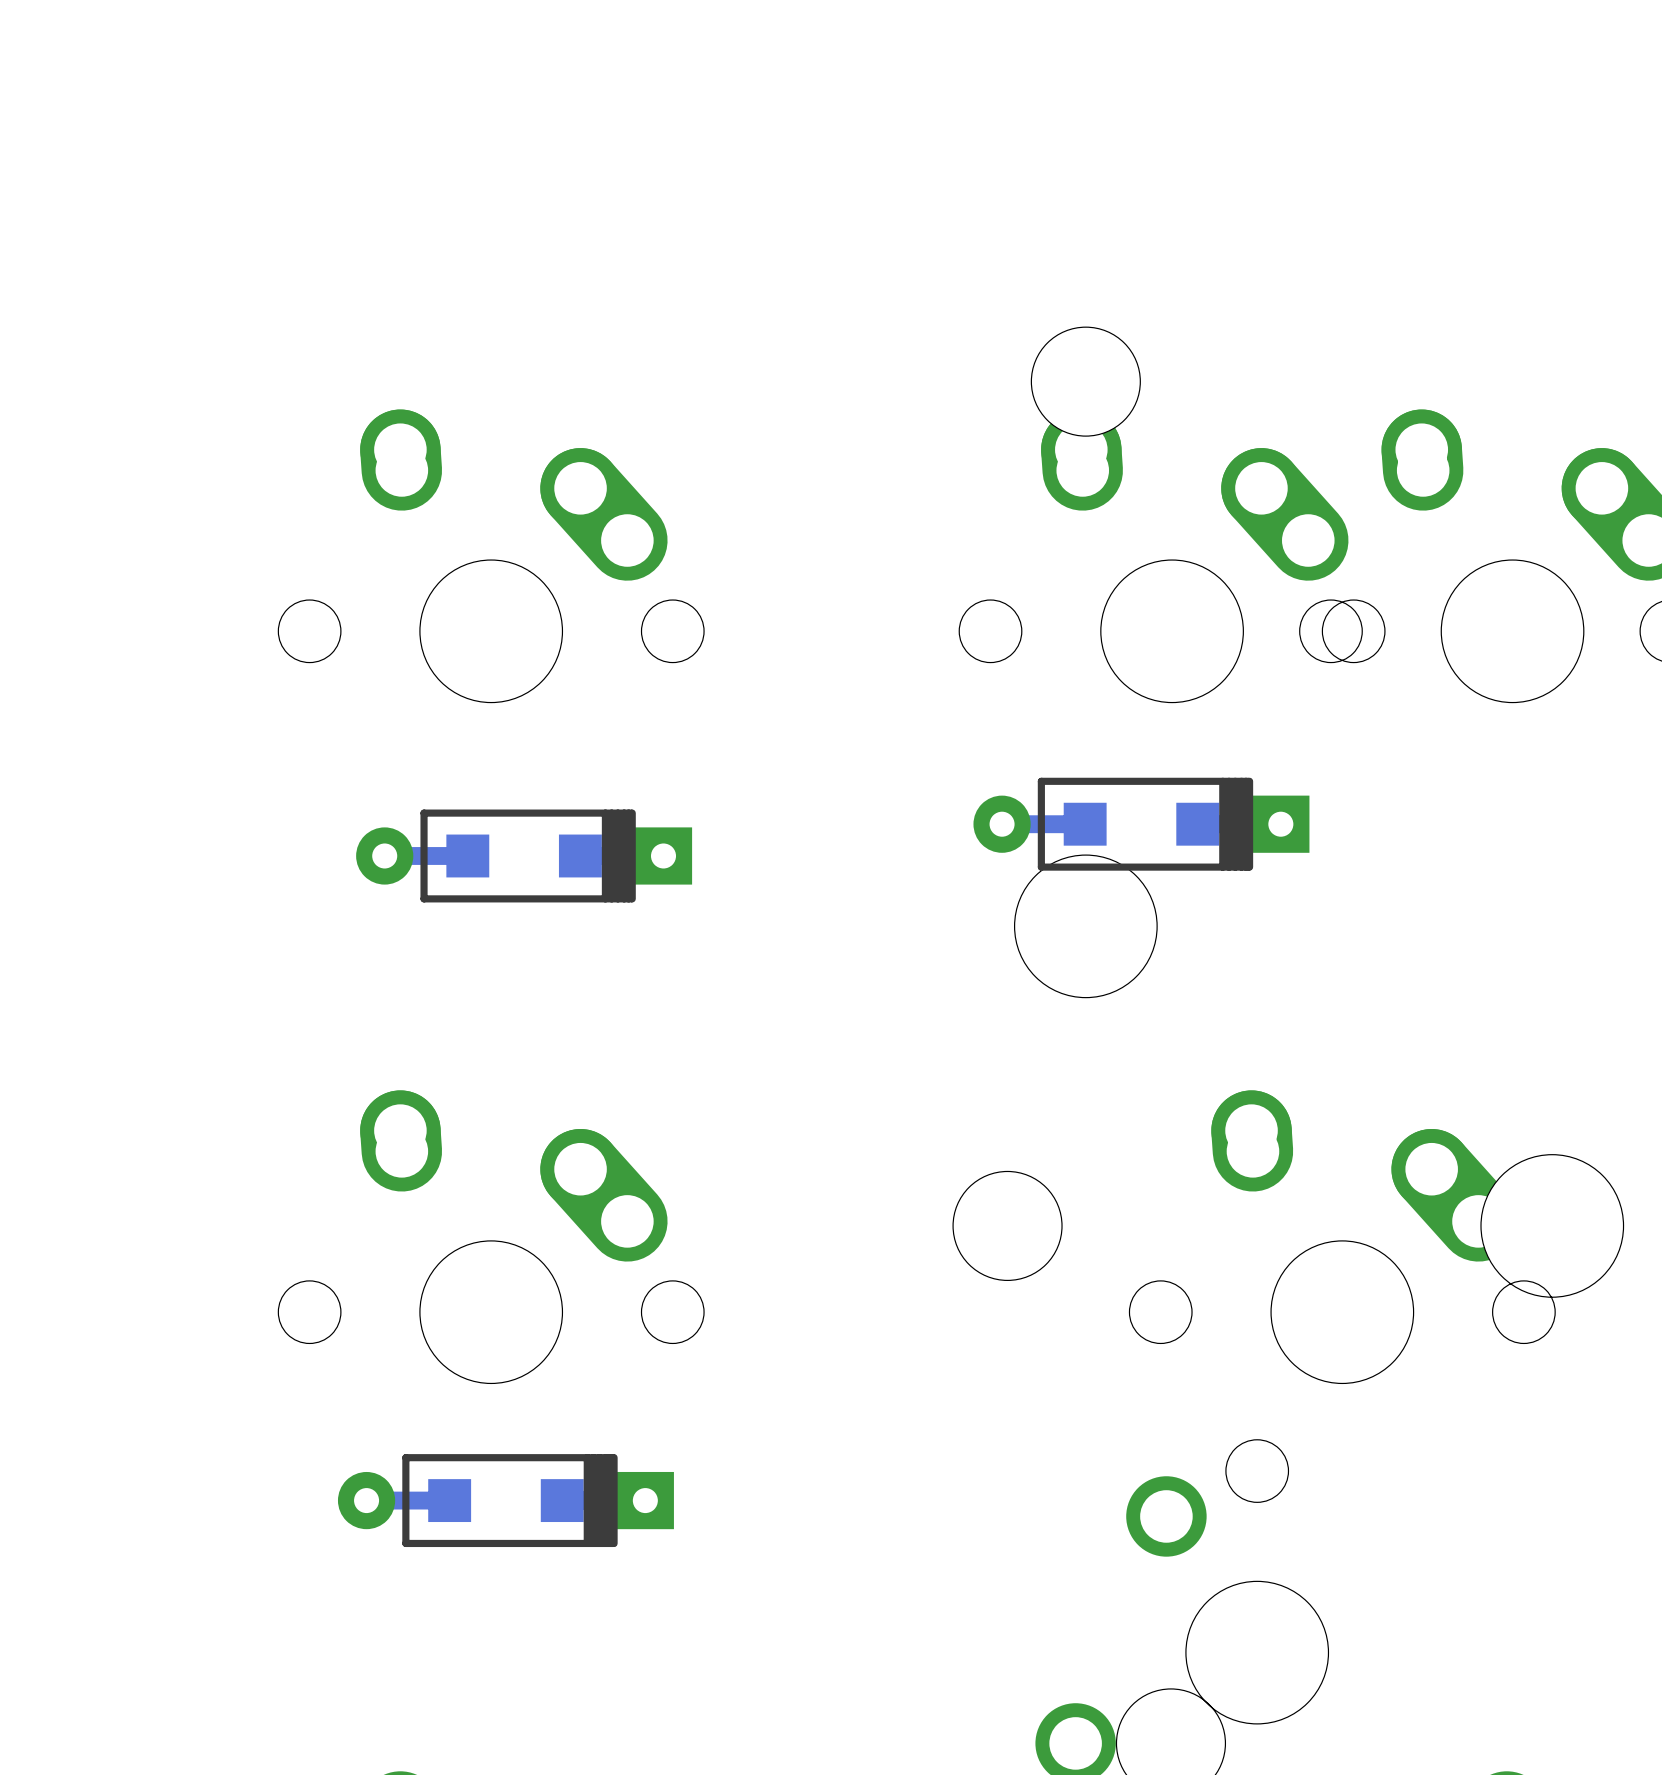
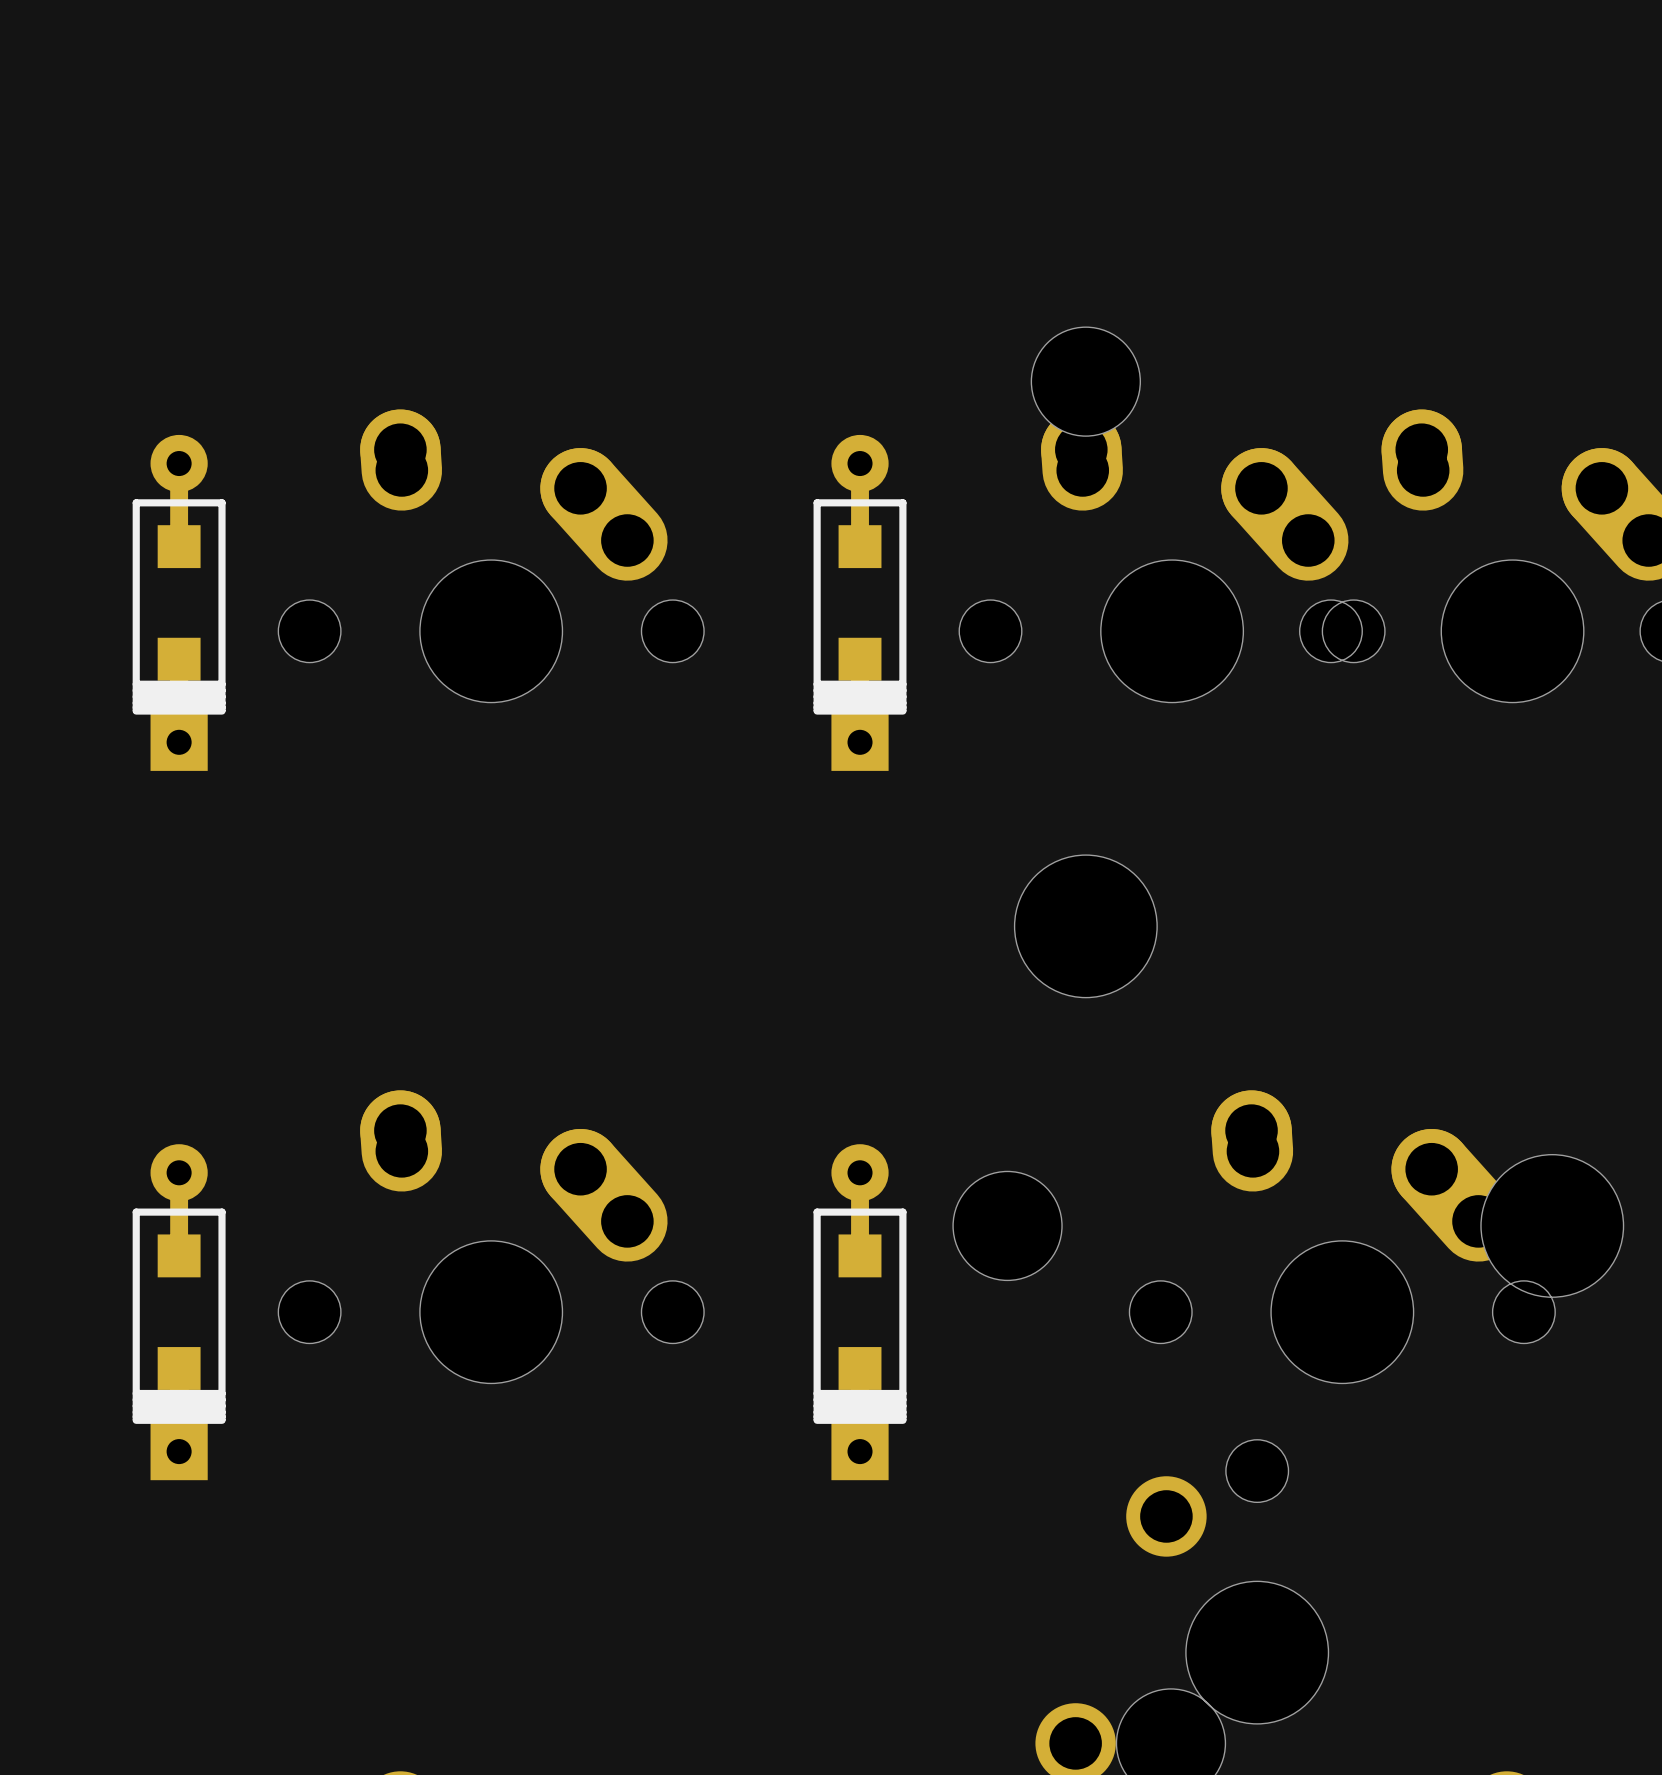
part: none -> (179, 602)
part: none -> (860, 602)
part: (1141, 824) -> none
part: (524, 855) -> none
part: none -> (179, 1312)
part: none -> (860, 1312)
part: (505, 1500) -> none

